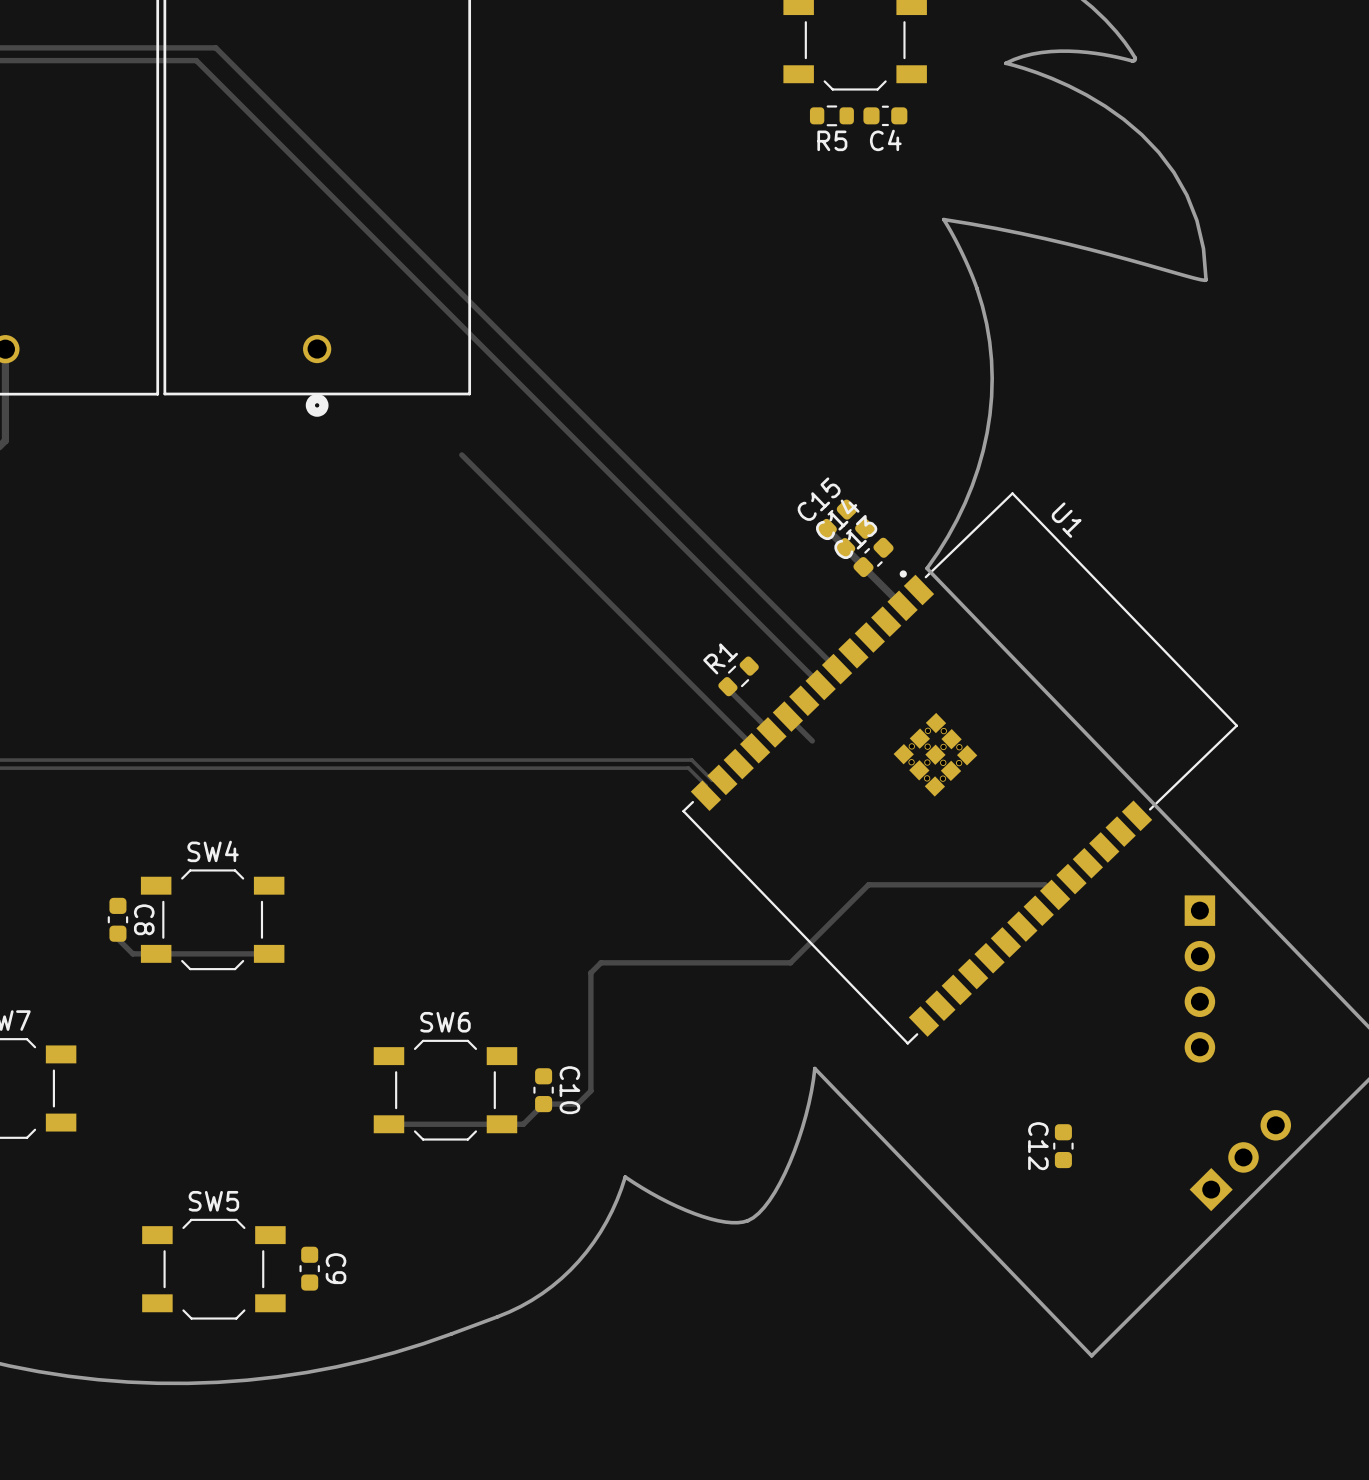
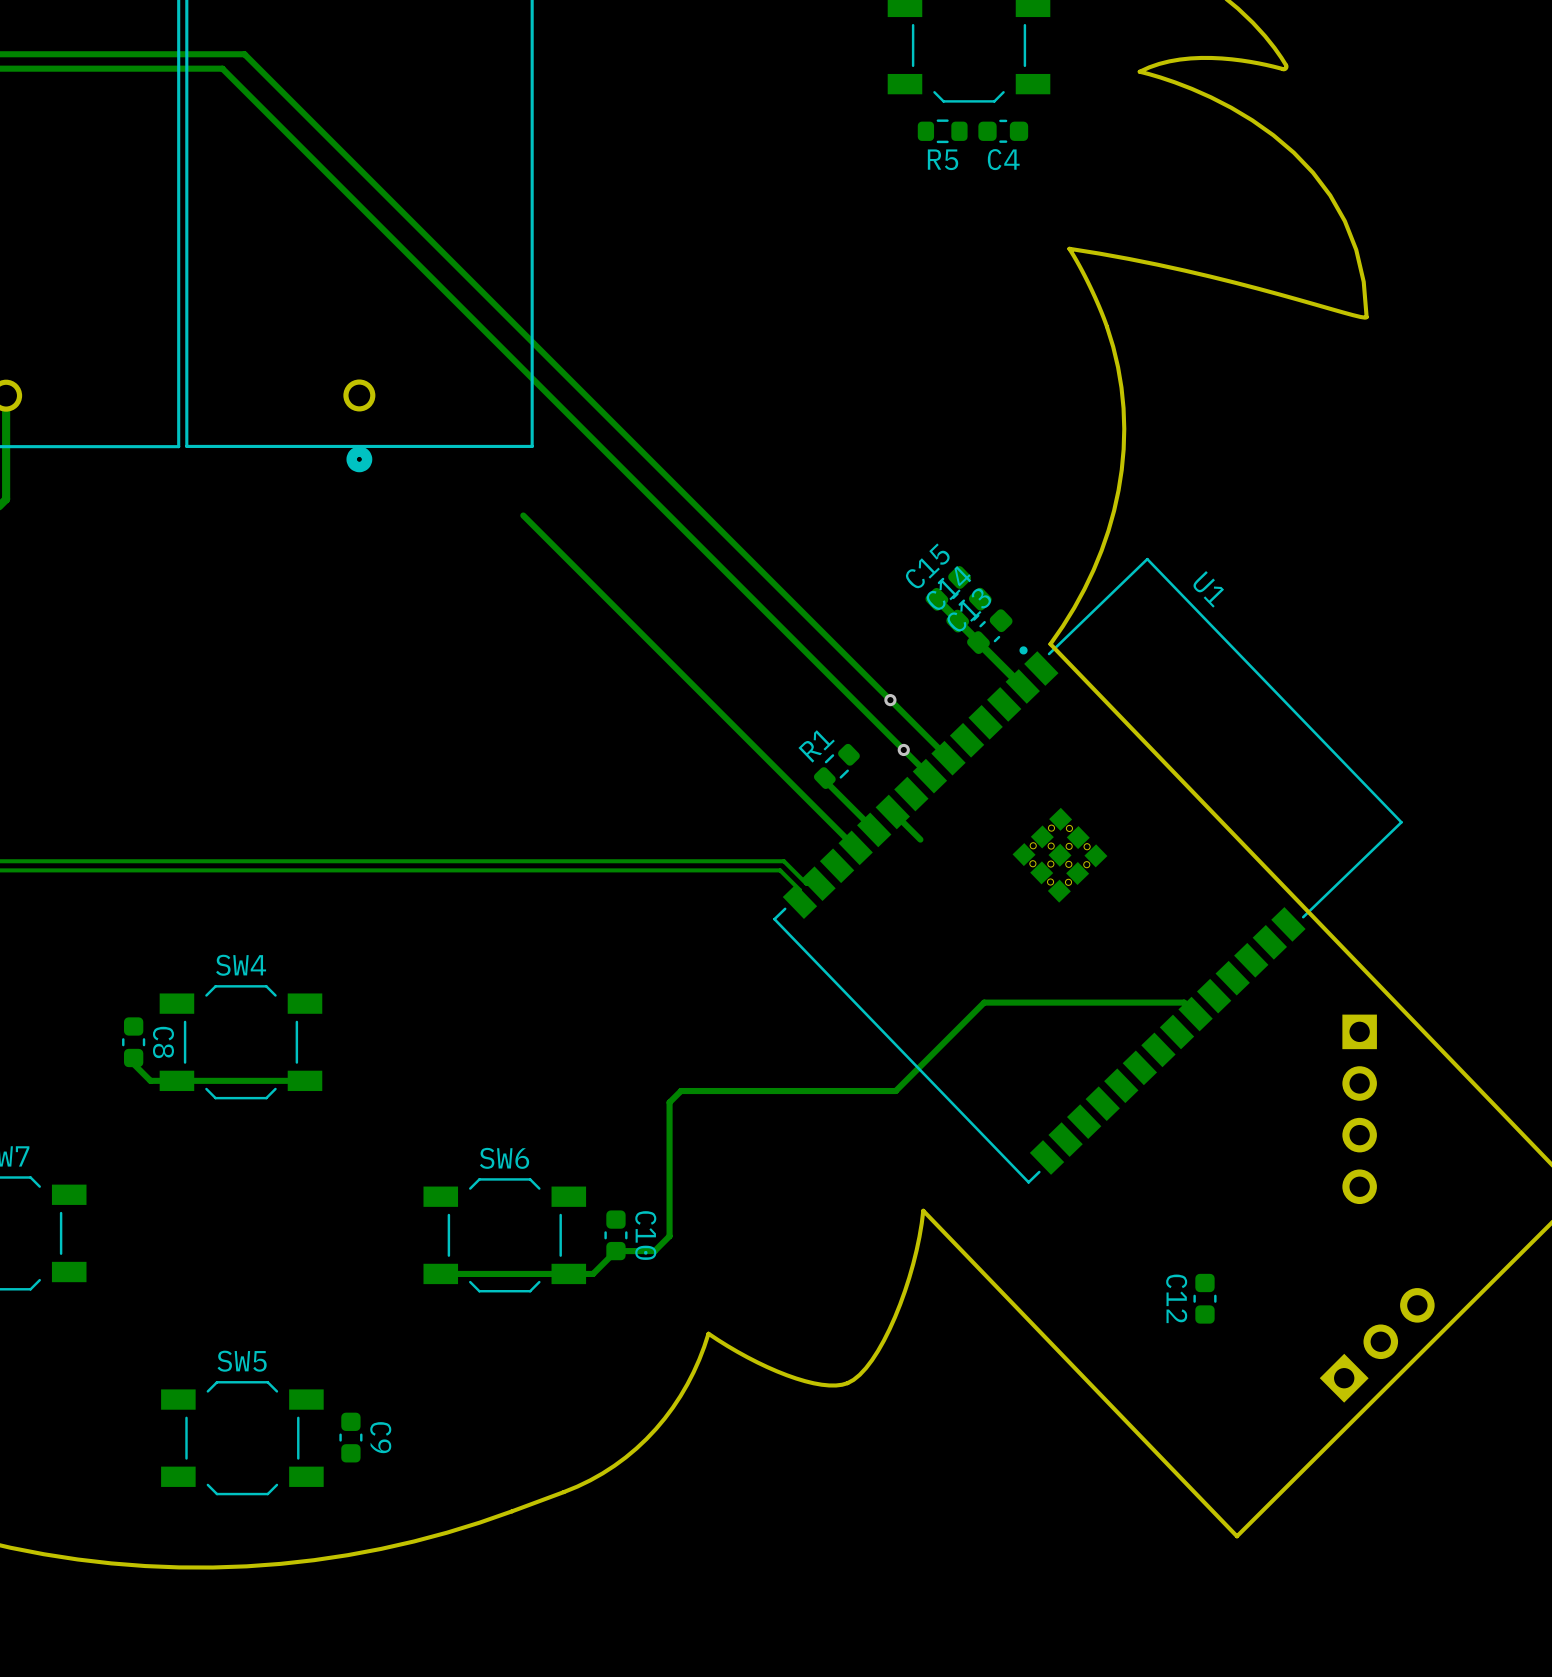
via: none -> (890, 700)
via: none -> (903, 749)
part position: (1240, 1160) -> (1377, 1345)

